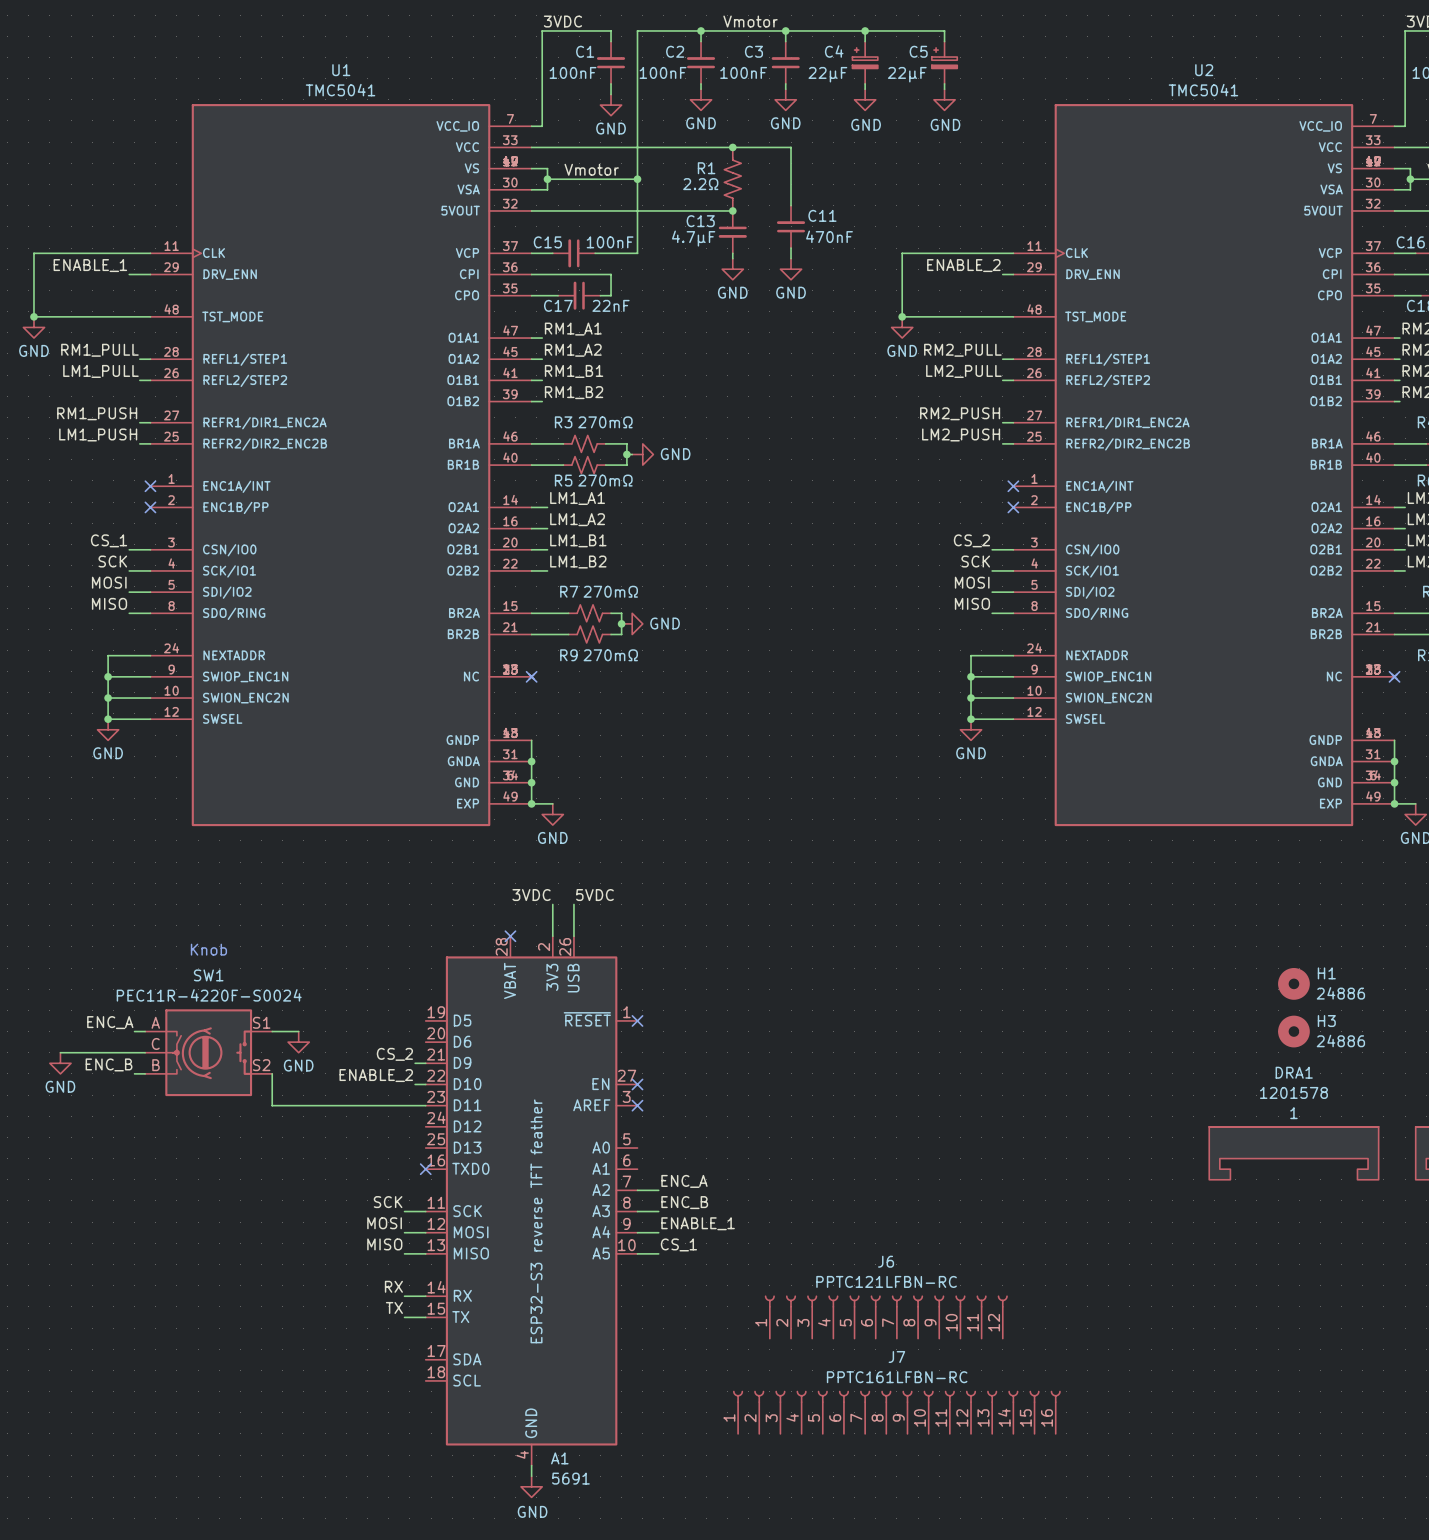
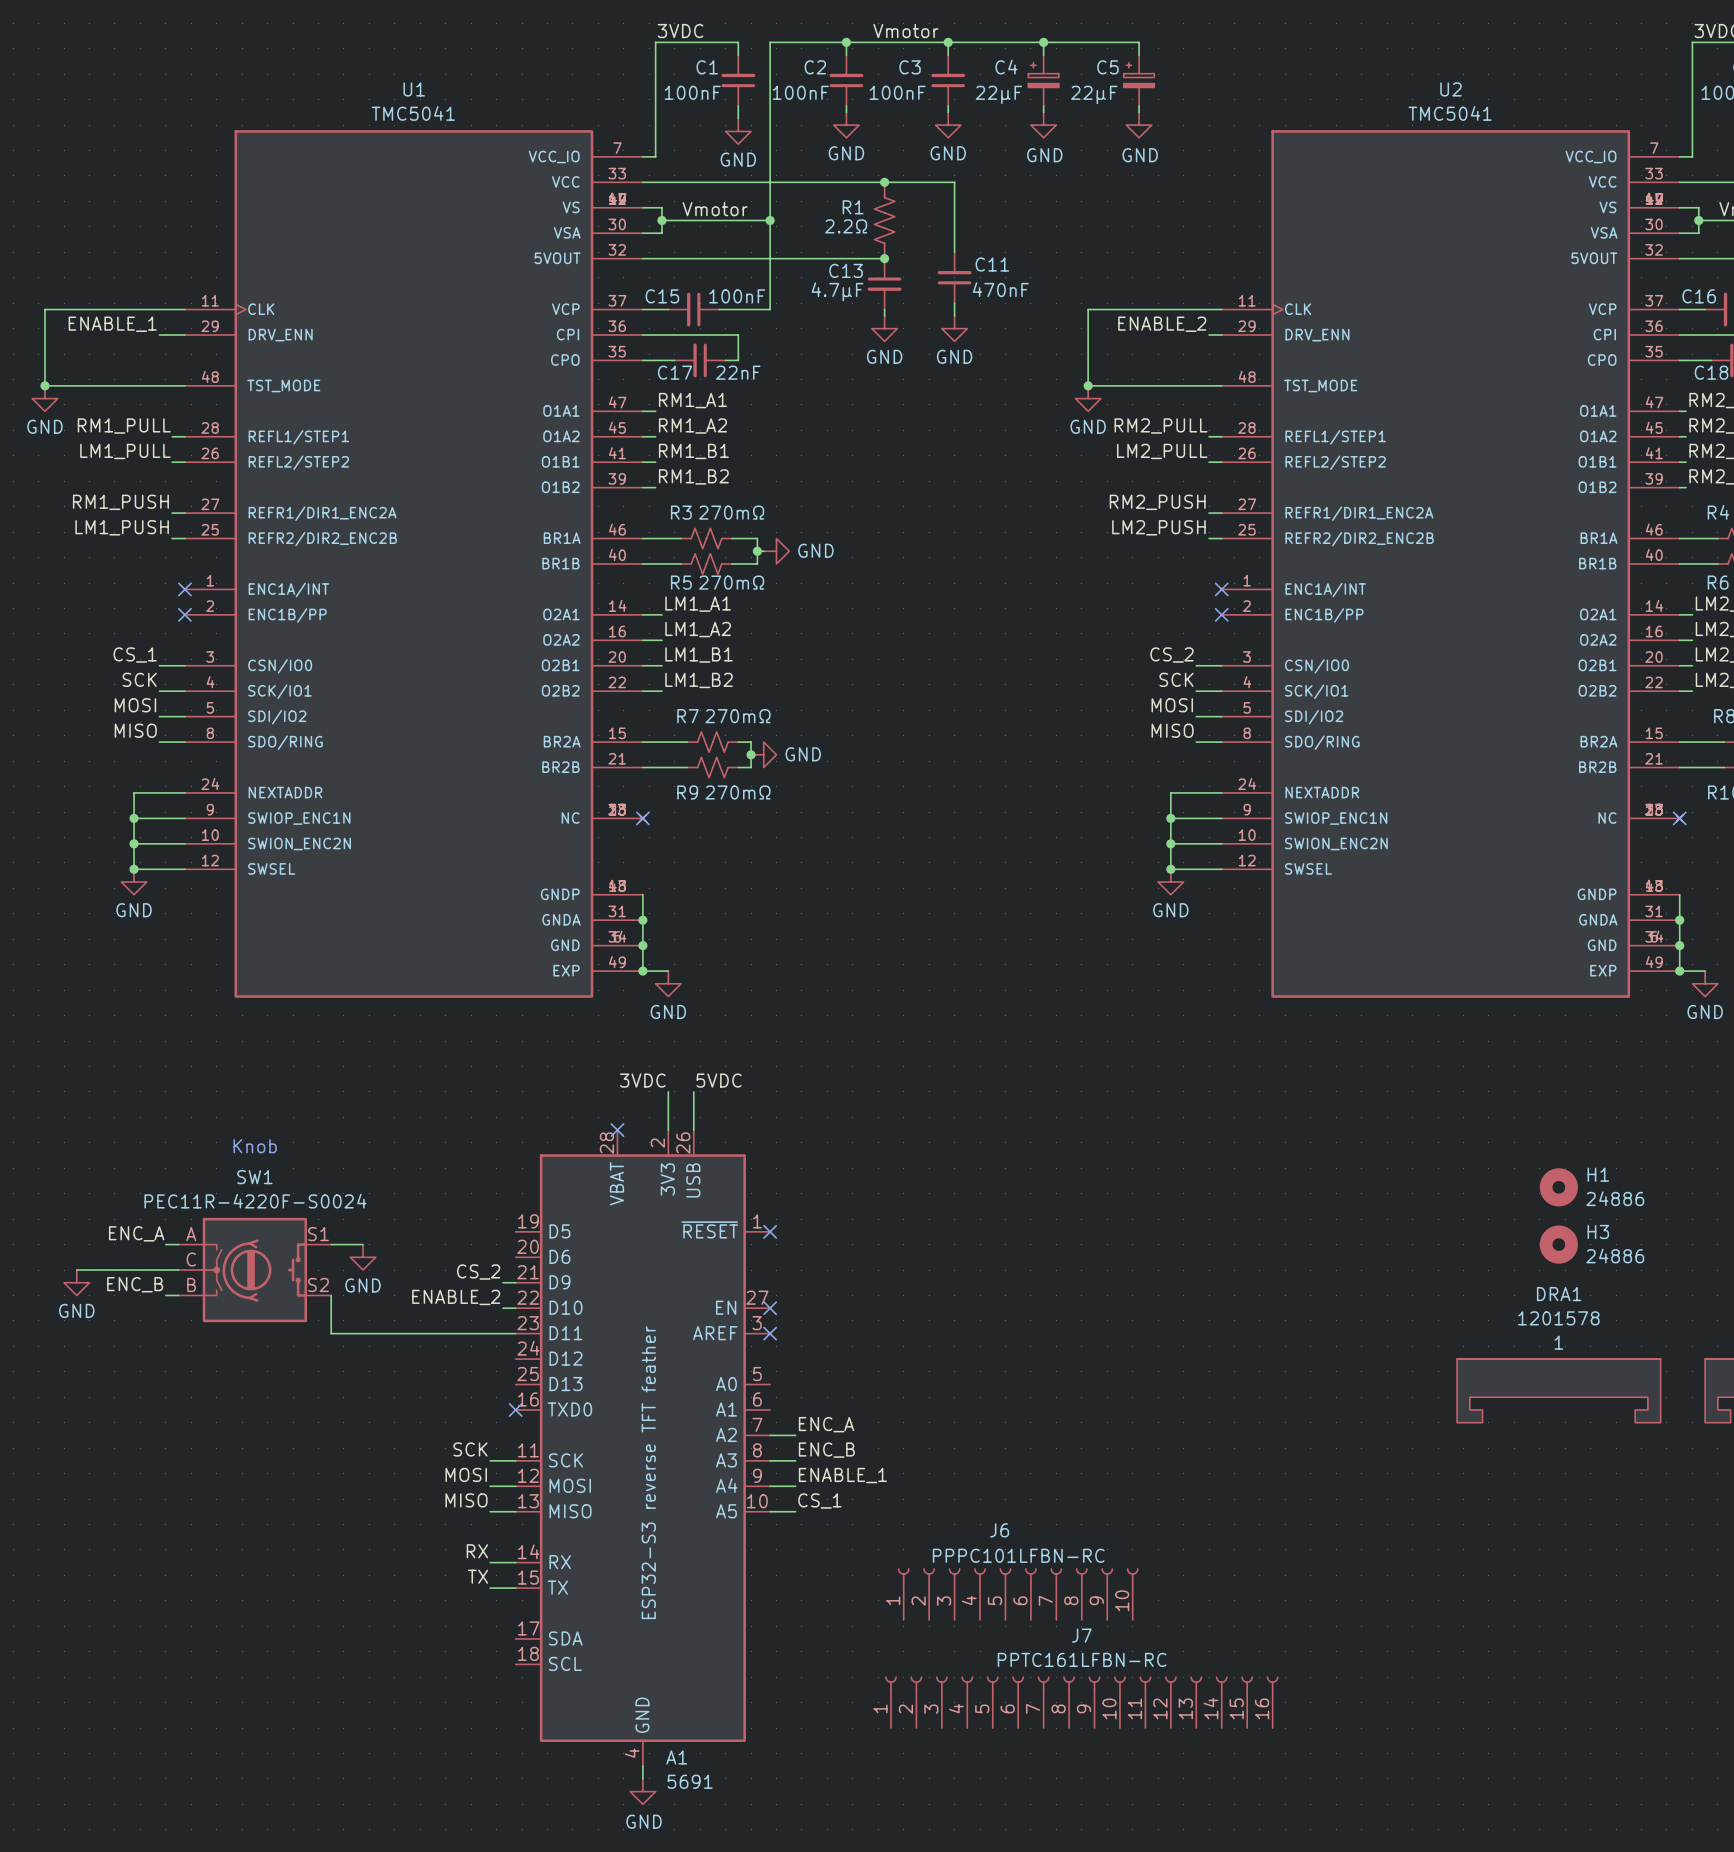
J6 name position: J6 (886, 1261) -> J6 (999, 1530)
J6 value: PPTC121LFBN-RC (886, 1281) -> PPPC101LFBN-RC (1018, 1555)
J6 symbol: [764, 1295, 1008, 1339] -> [897, 1568, 1139, 1620]

